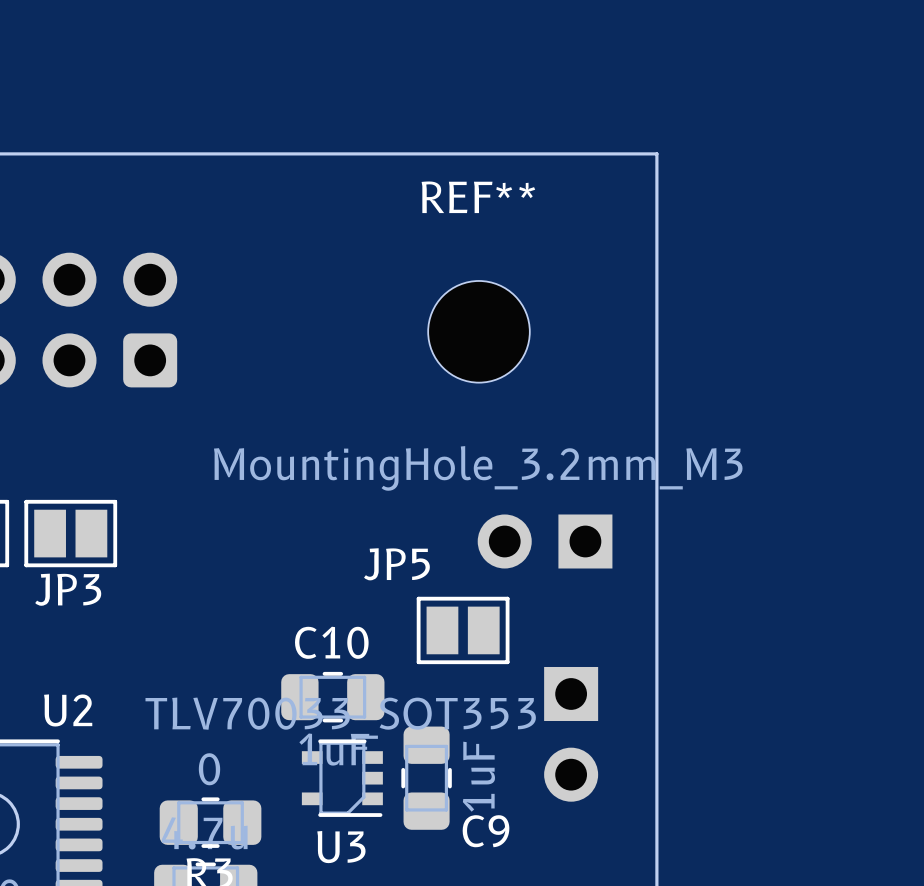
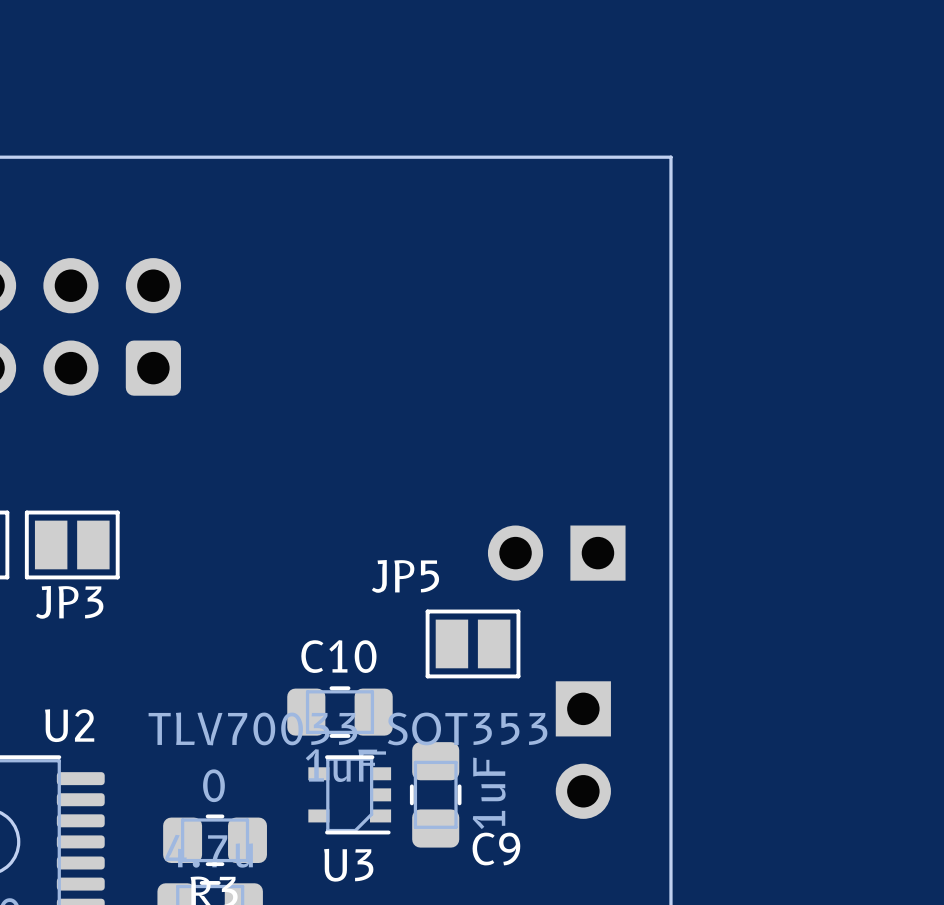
REF**: MountingHole_3.2mm_M3 (478, 331) -> none

